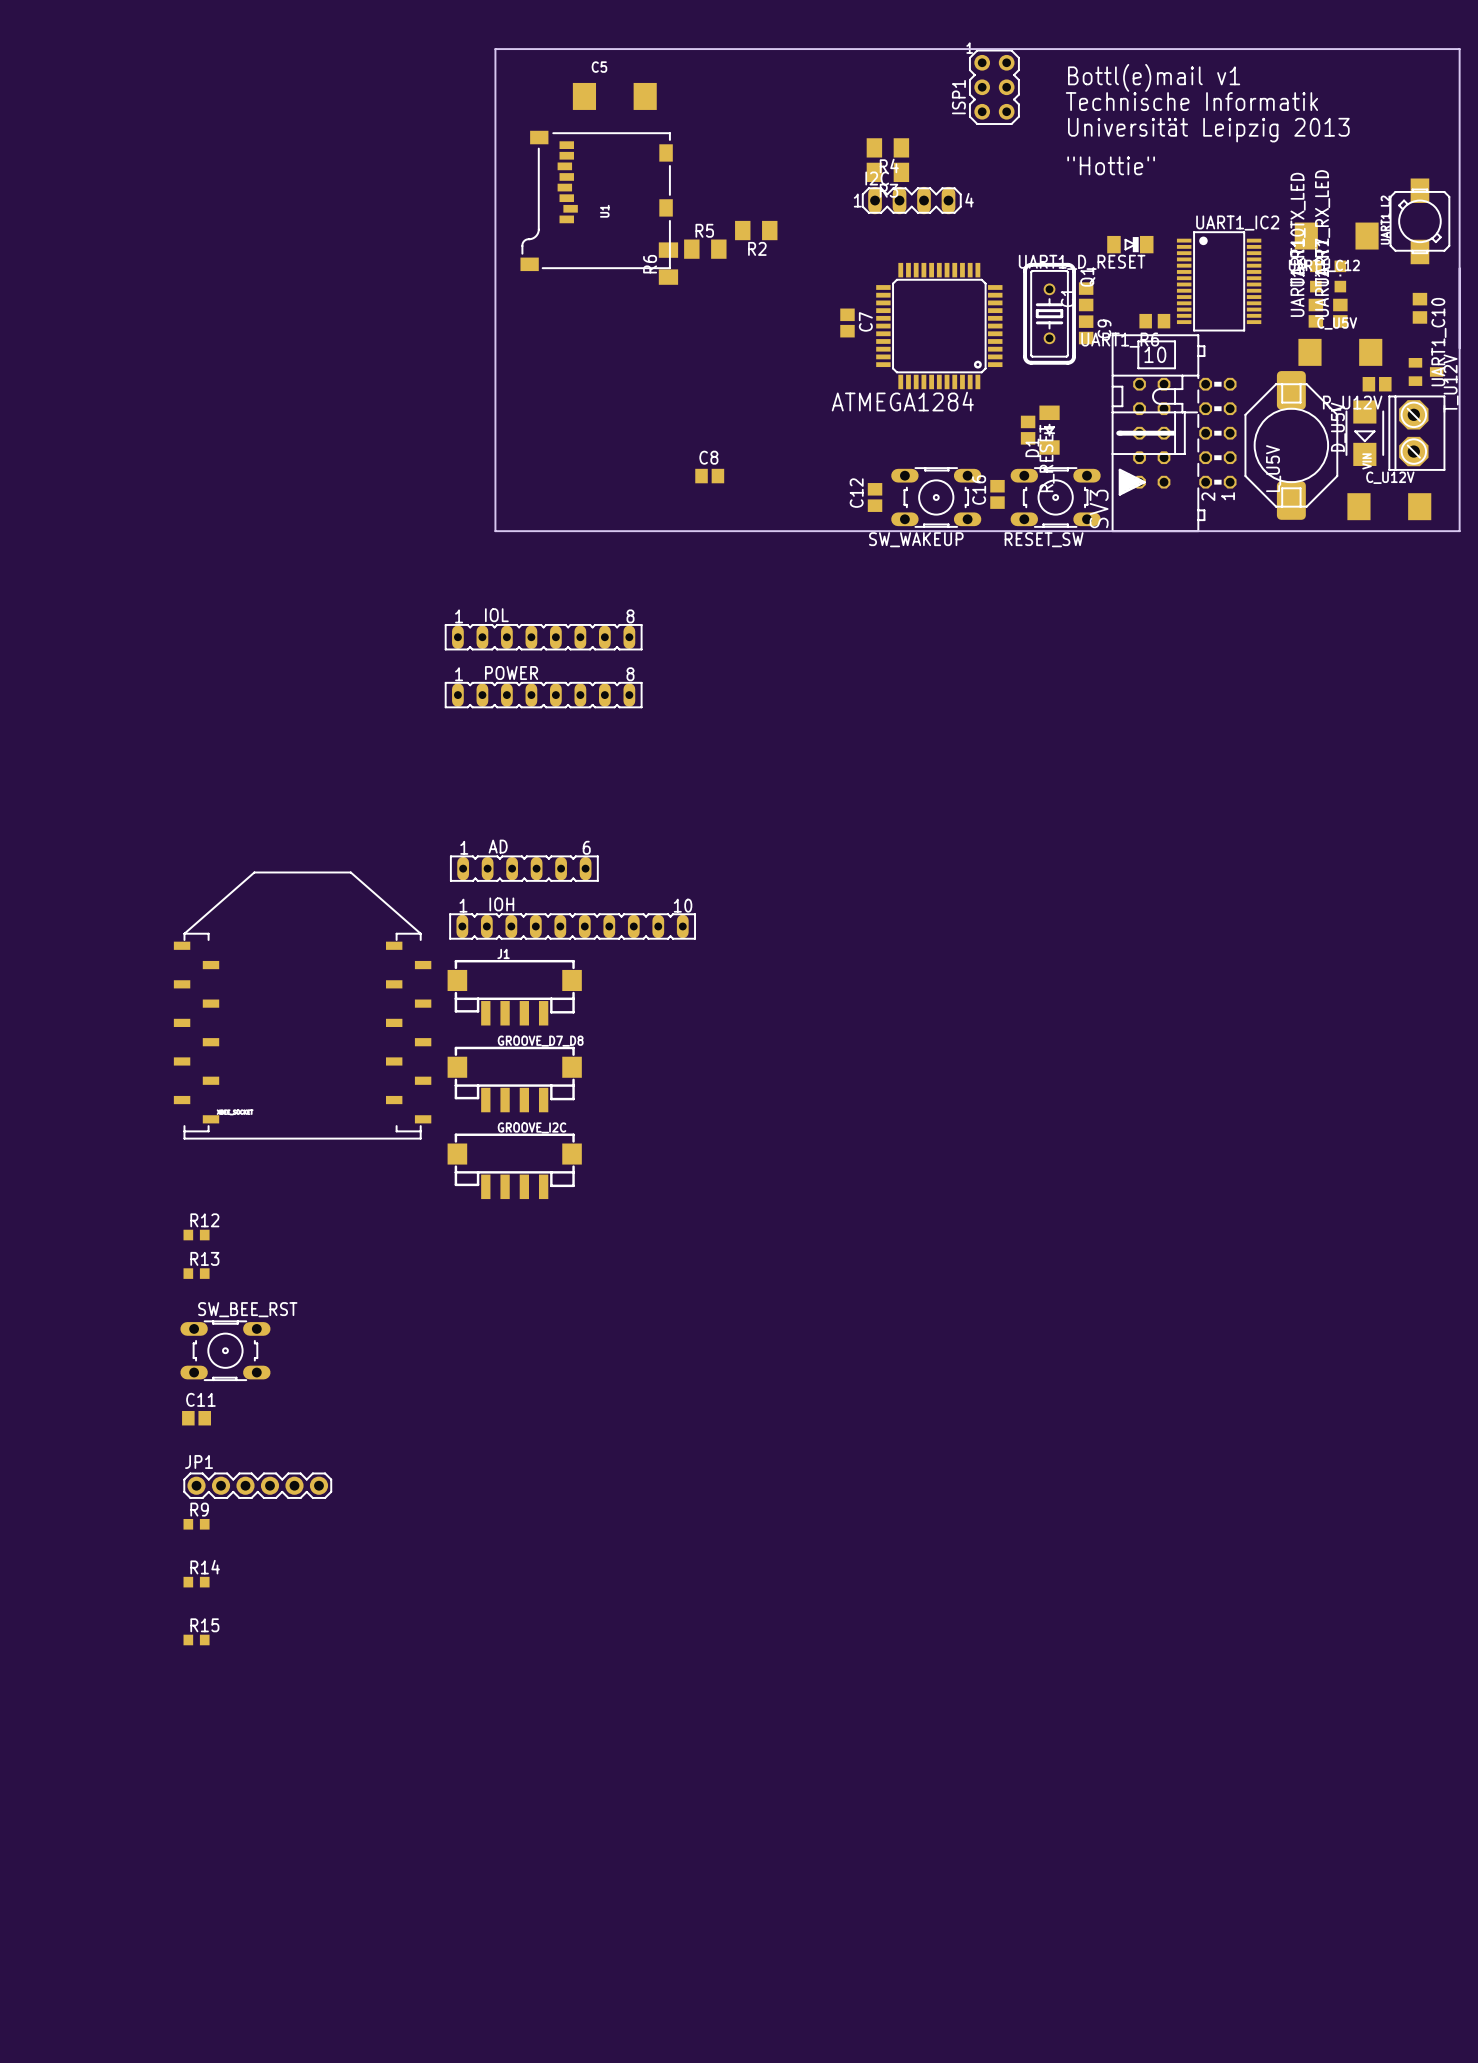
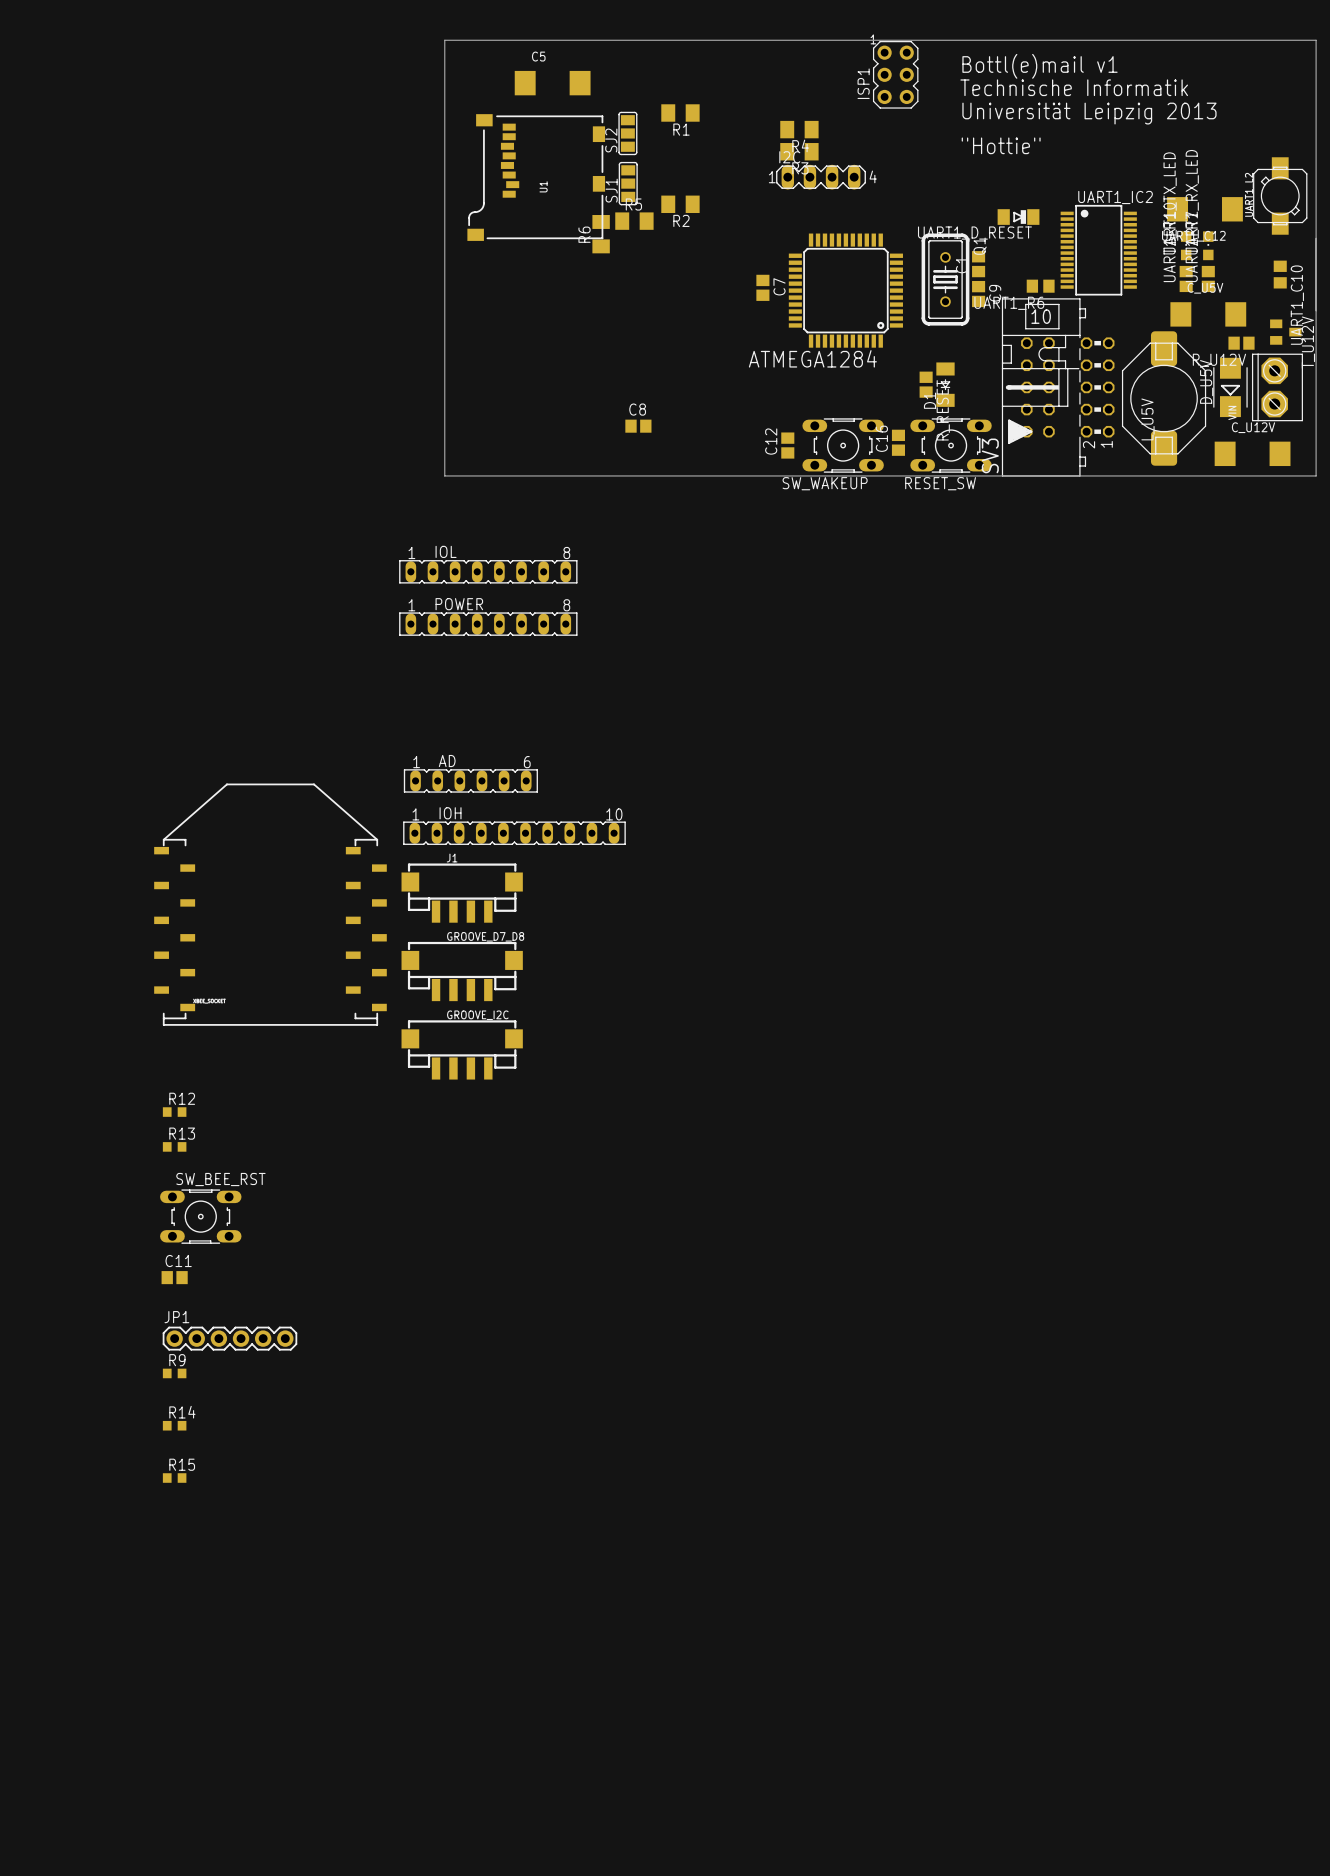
R1: none -> (680, 113)
SJ2: none -> (627, 133)
SJ1: none -> (628, 183)

